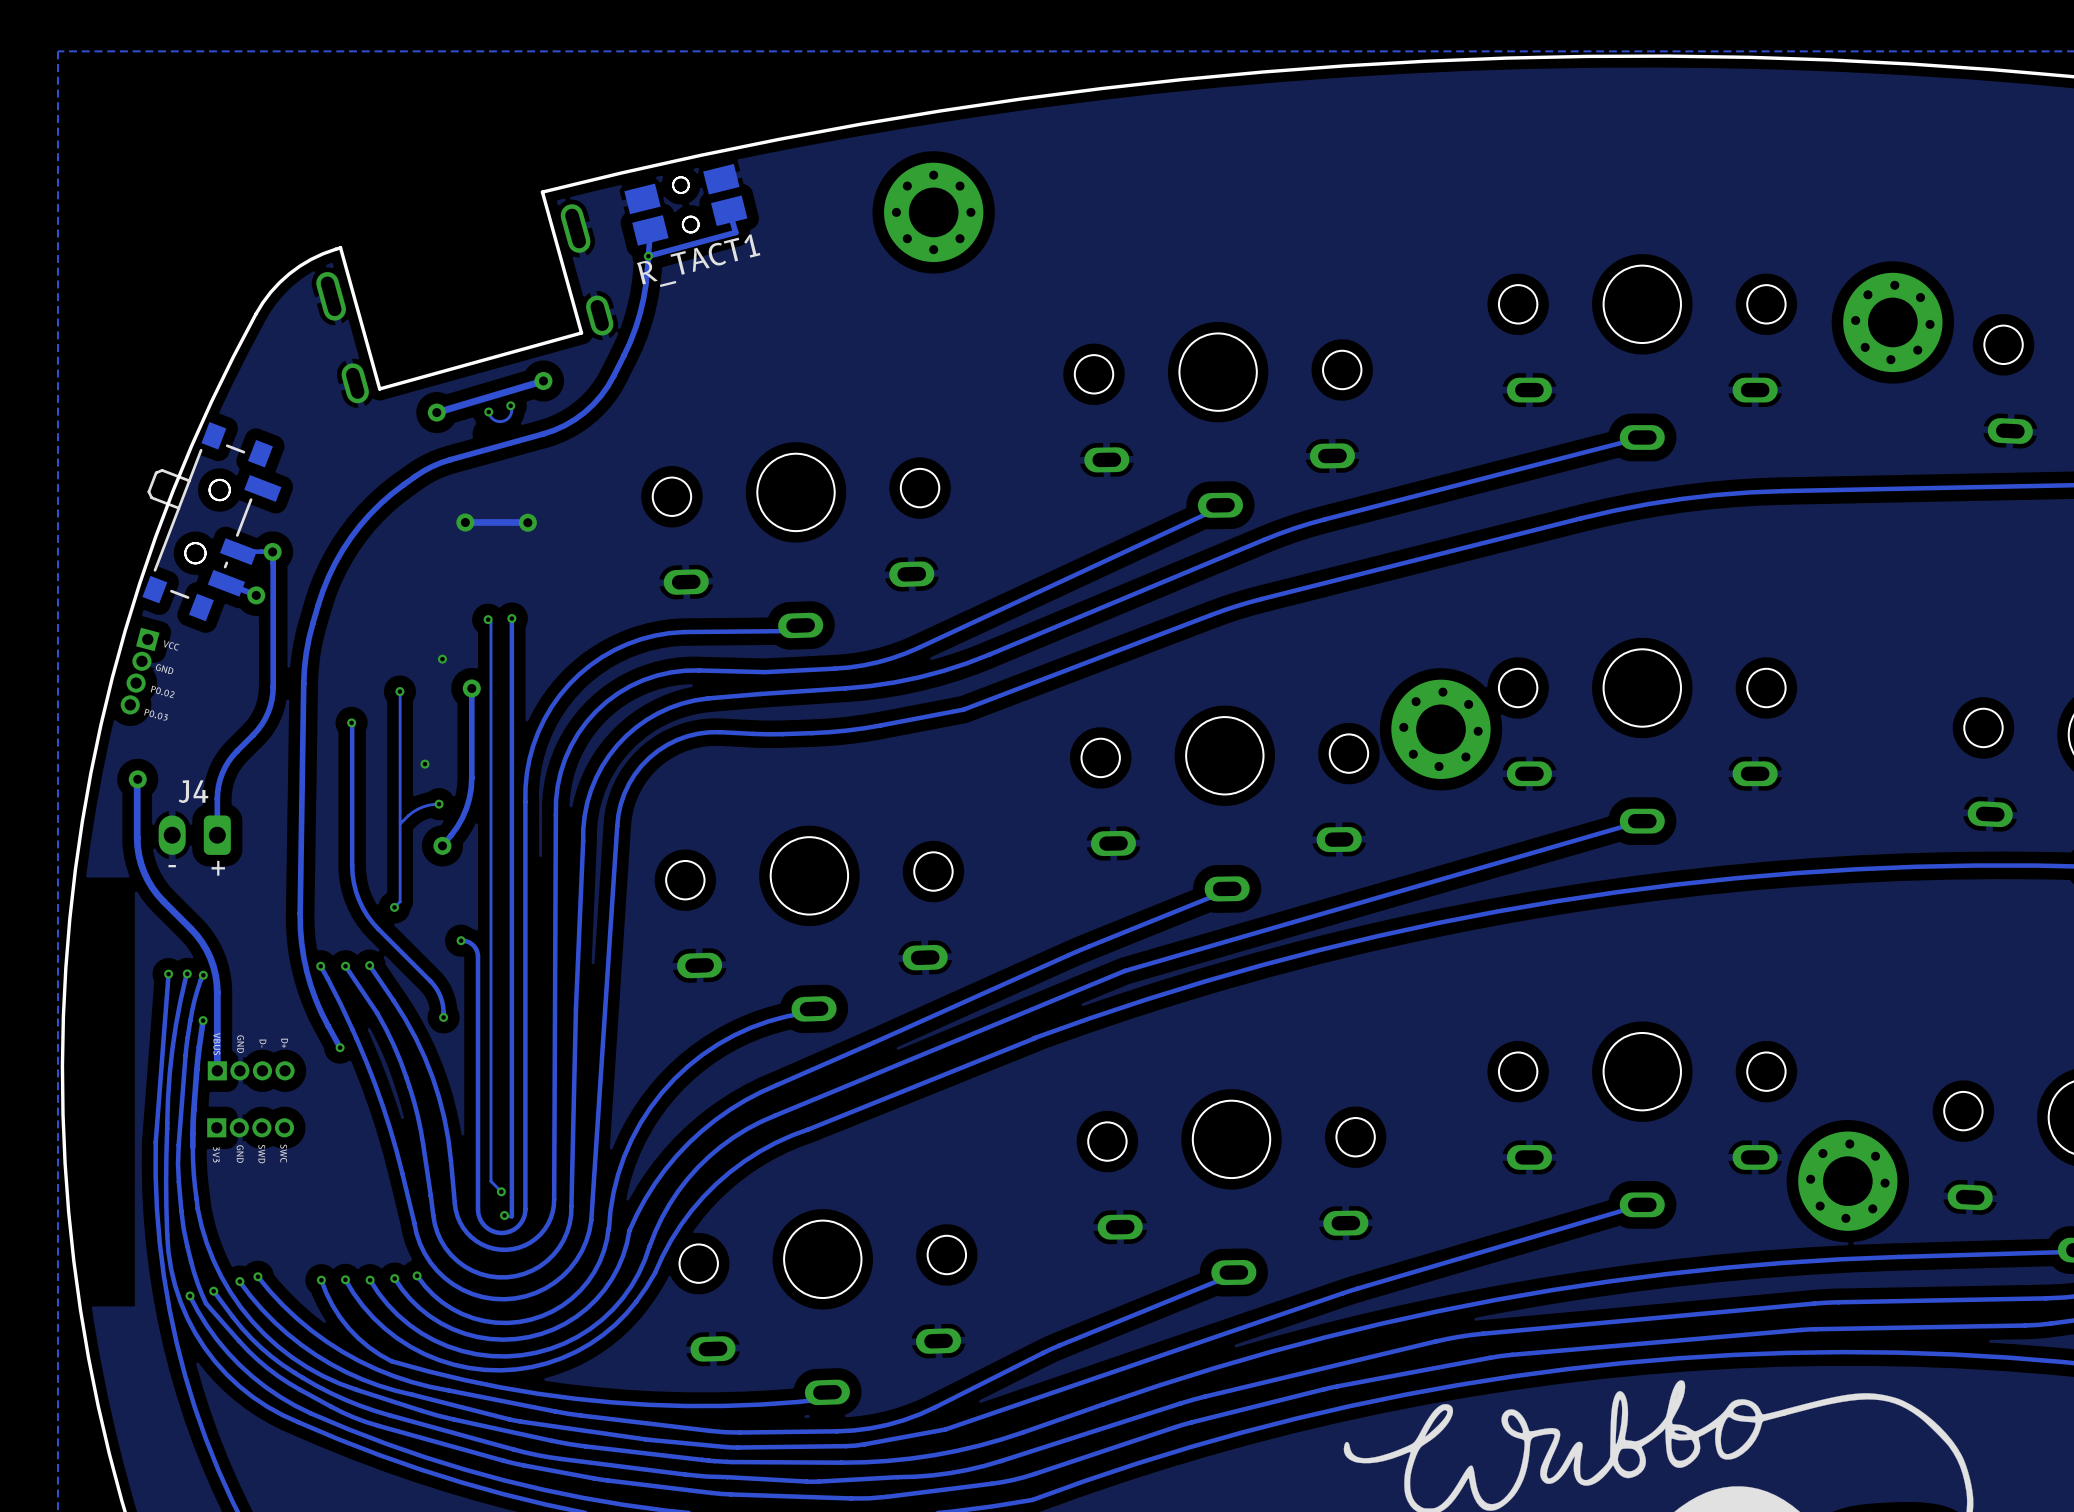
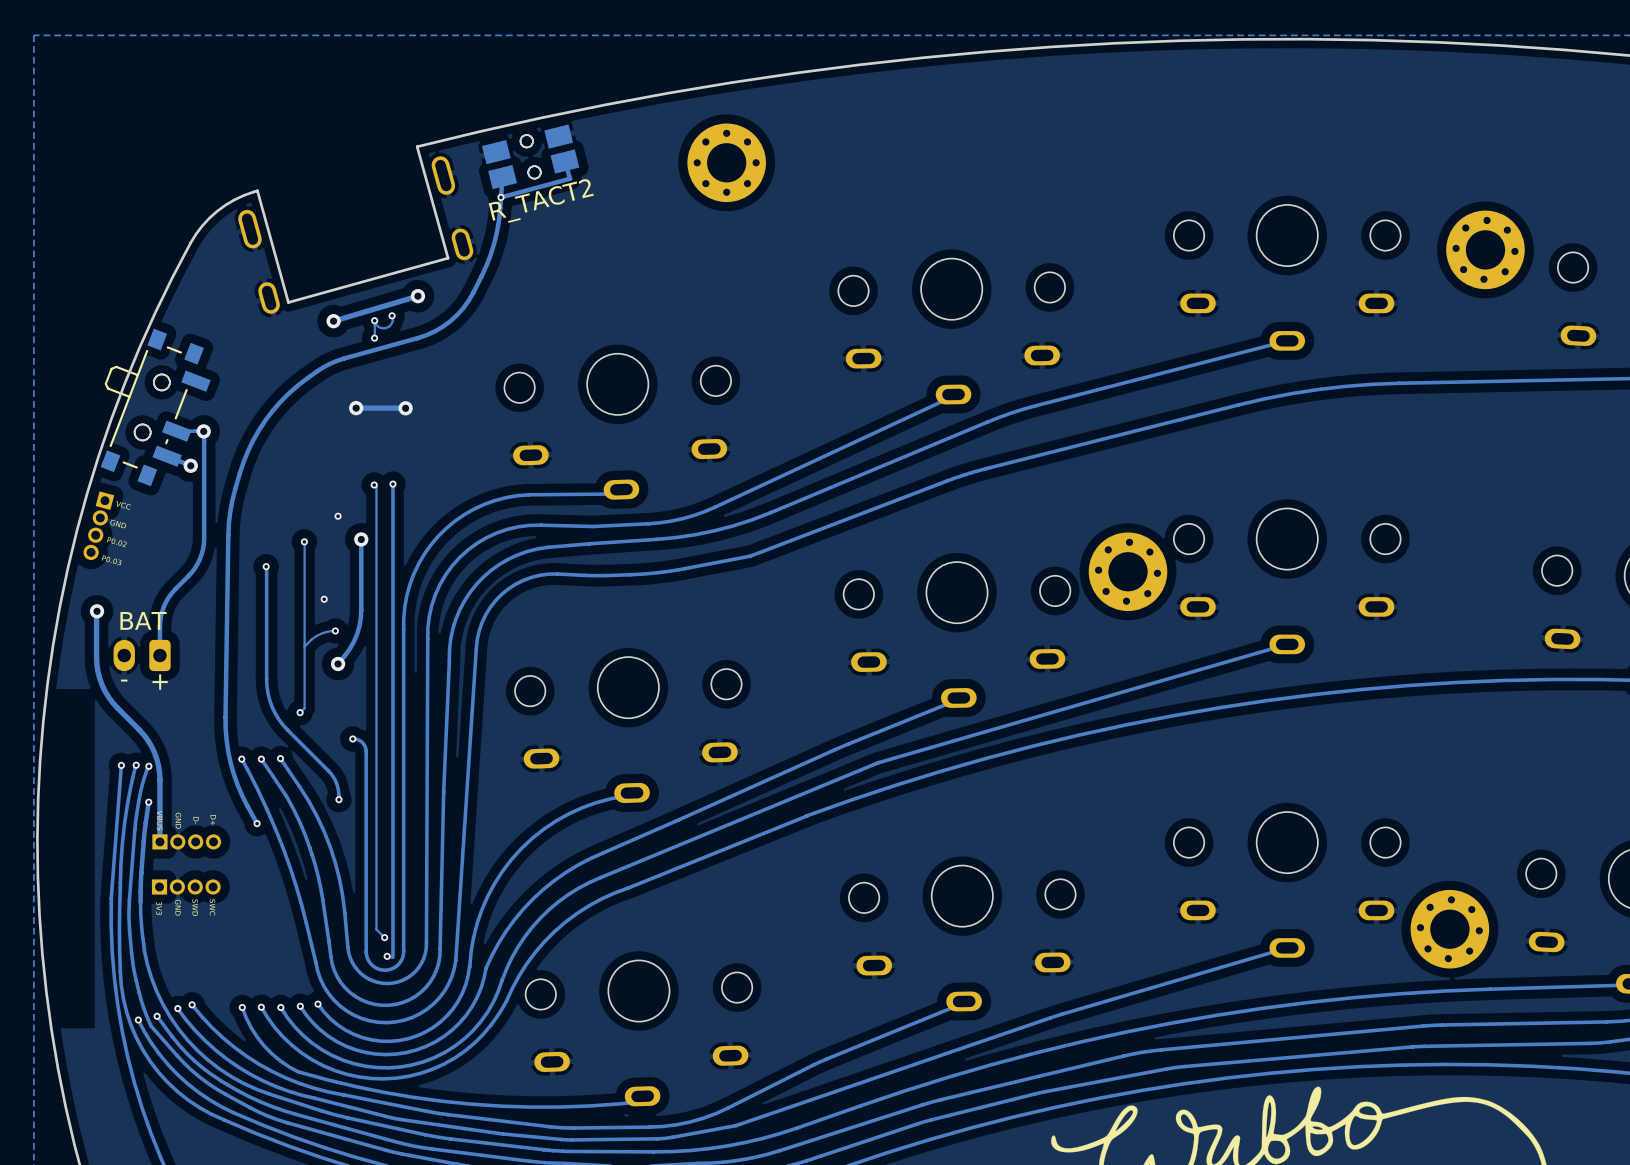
R_TACT1 name: R_TACT1 (698, 260) -> R_TACT2 (541, 200)
track: none -> (374, 320) (374, 338)
via: none -> (374, 338)
J4 name: J4 (193, 791) -> BAT (143, 620)

